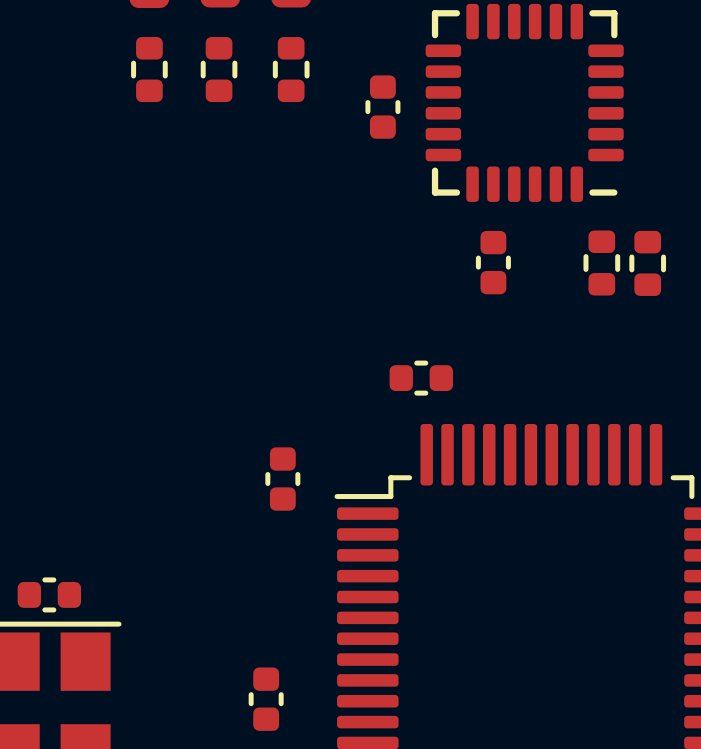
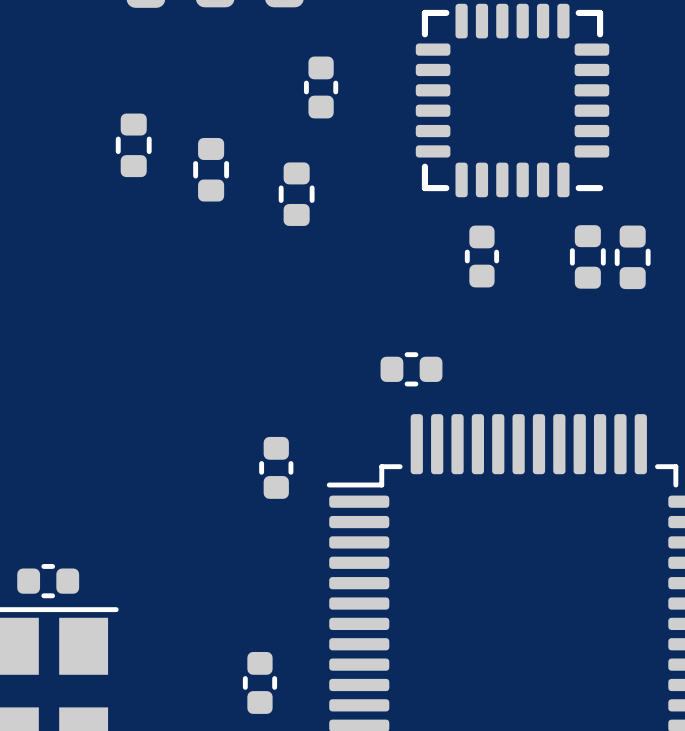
part: (149, 69) -> none
part: (219, 69) -> none
part: (291, 69) -> none
part position: (382, 107) -> (321, 87)
part: none -> (133, 145)
part: none -> (211, 169)
part: none -> (296, 194)

